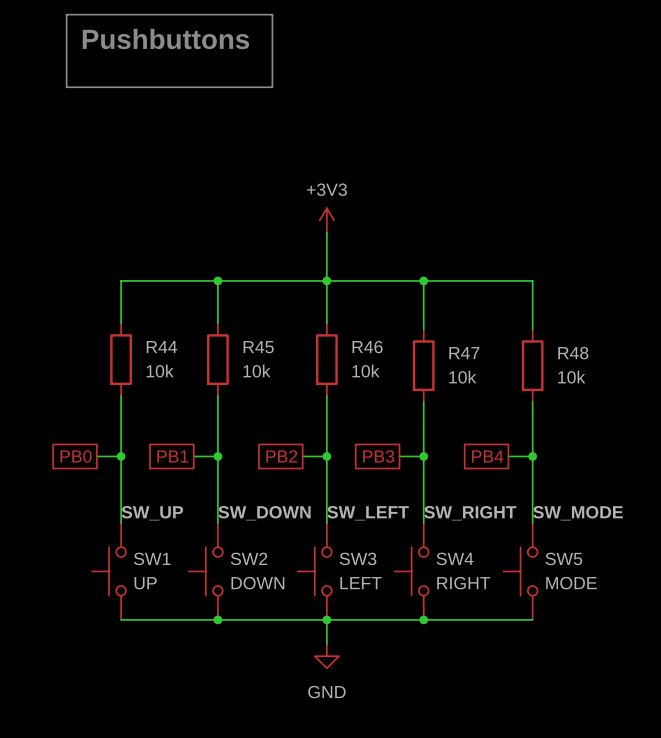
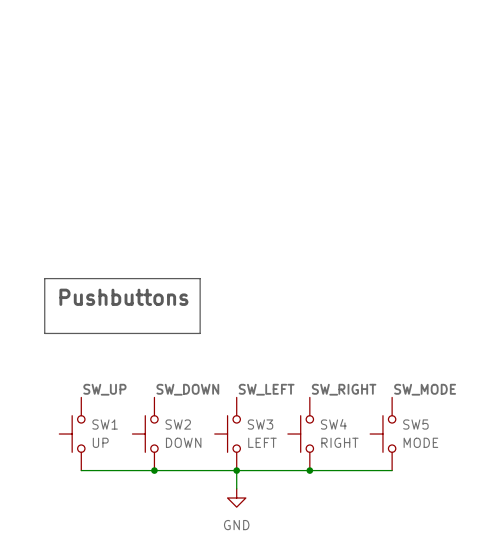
line: (66, 14) (272, 14) (272, 87) (66, 87) (66, 14) -> none
text: Pushbuttons (165, 39) -> none
power symbol: +3V3 (326, 220) -> none
wire: (326, 232) (326, 323) -> none
wire: (217, 280) (217, 323) -> none
junction: (217, 280) -> none
junction: (326, 280) -> none
wire: (423, 280) (423, 329) -> none
junction: (423, 280) -> none
wire: (121, 323) (121, 280) (532, 280) (532, 329) -> none
R44: 10k (121, 359) -> none
R45: 10k (217, 359) -> none
R46: 10k (326, 359) -> none
line: none -> (44, 278) (200, 278) (200, 333) (44, 333) (44, 278)
R47: 10k (423, 365) -> none
R48: 10k (532, 365) -> none
text: none -> Pushbuttons (123, 297)
wire: (121, 395) (121, 523) -> none
wire: (217, 395) (217, 523) -> none
wire: (326, 395) (326, 523) -> none
wire: (423, 402) (423, 523) -> none
wire: (532, 402) (532, 523) -> none
global label: PB0 (76, 456) -> none
wire: (96, 456) (121, 456) -> none
junction: (121, 456) -> none
global label: PB1 (172, 456) -> none
wire: (193, 456) (217, 456) -> none
junction: (217, 456) -> none
global label: PB2 (281, 456) -> none
wire: (302, 456) (326, 456) -> none
junction: (326, 456) -> none
global label: PB3 (378, 456) -> none
wire: (399, 456) (423, 456) -> none
junction: (423, 456) -> none
global label: PB4 (487, 456) -> none
wire: (508, 456) (532, 456) -> none
junction: (532, 456) -> none

